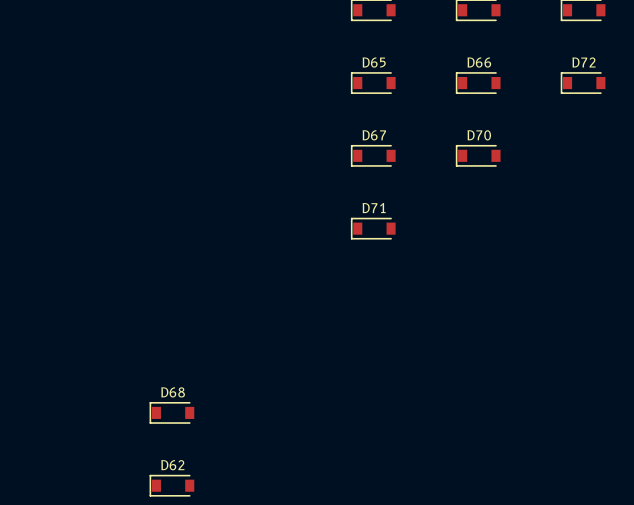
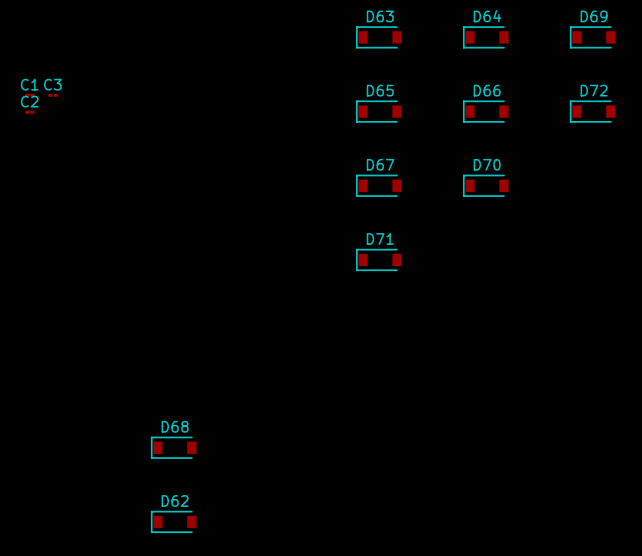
C1: none -> (29, 95)
C3: none -> (52, 95)
C2: none -> (29, 112)

